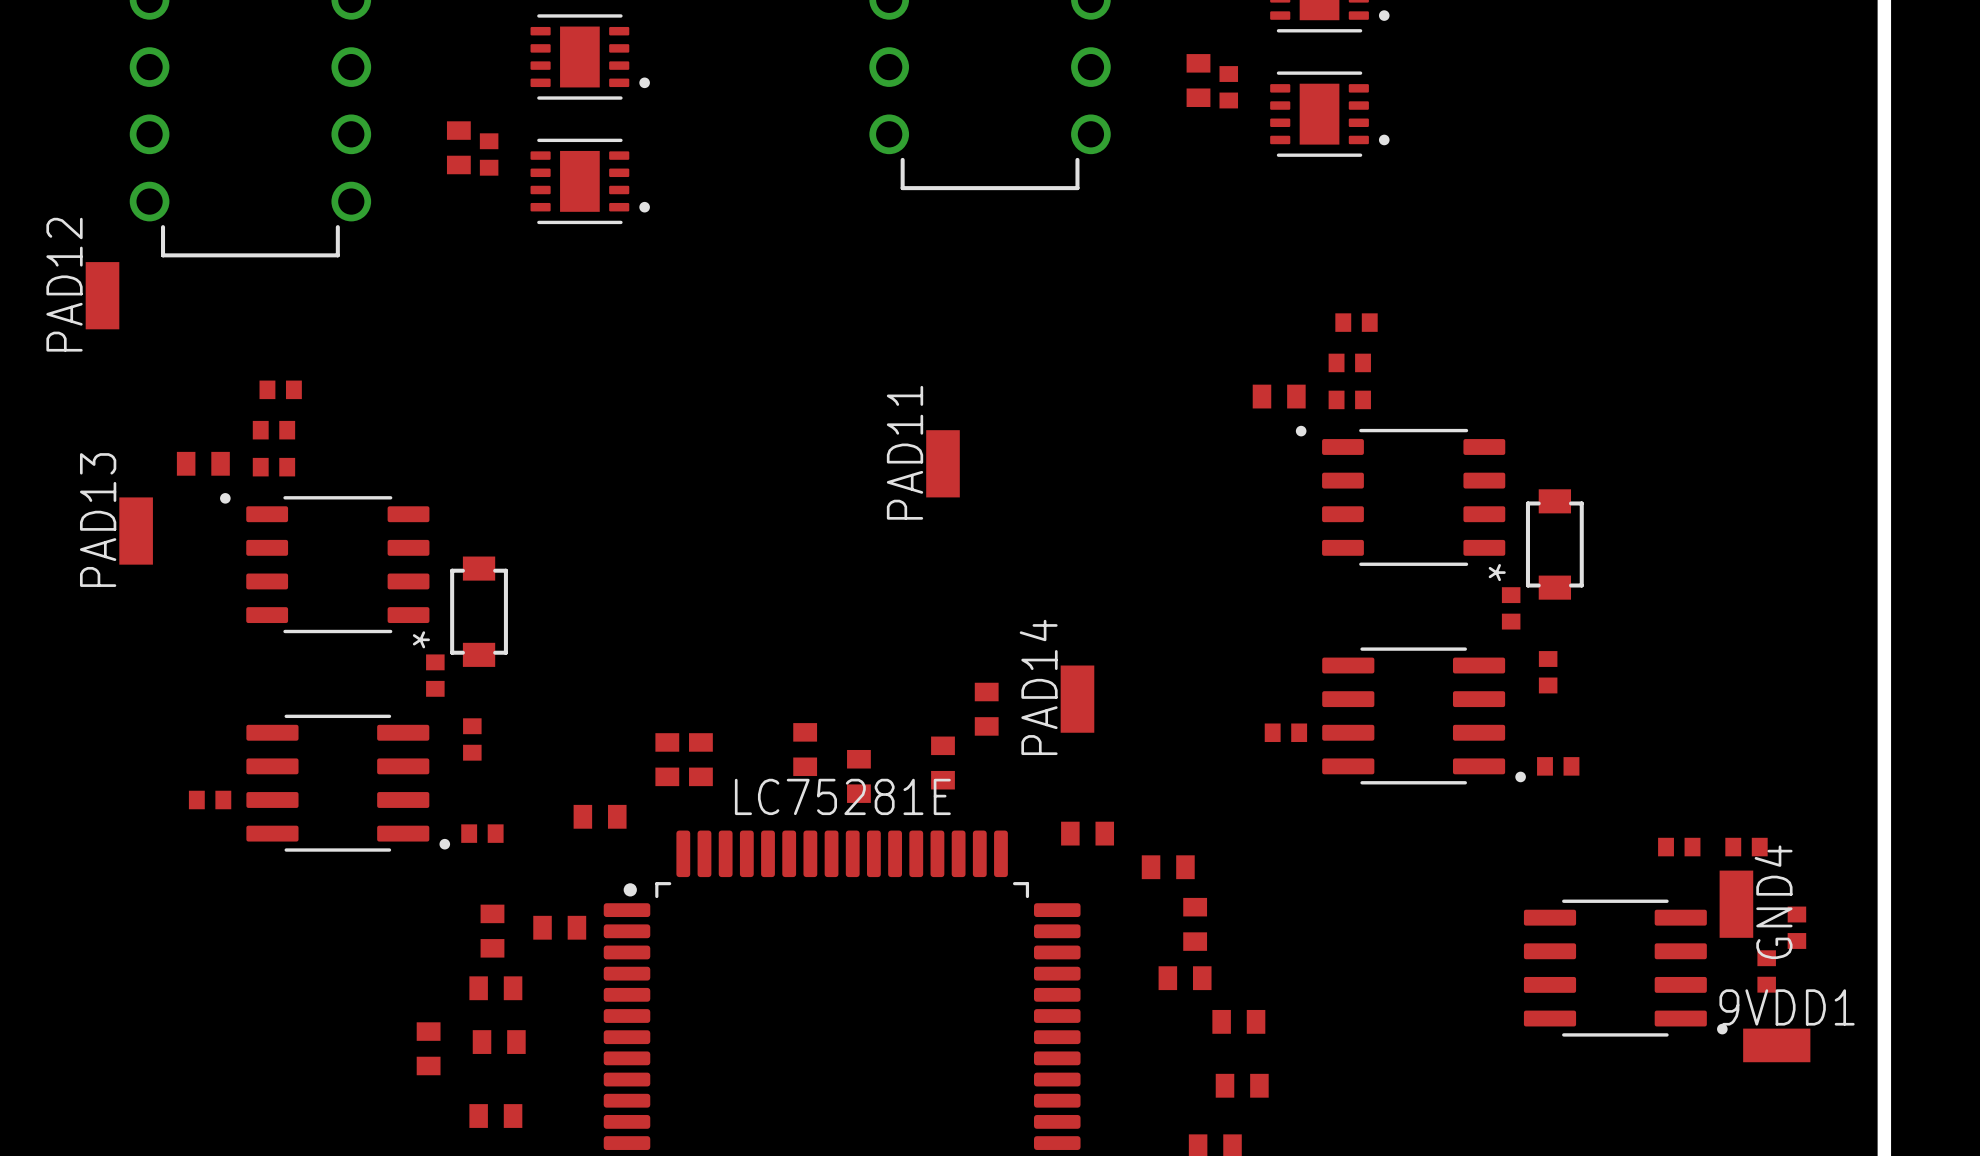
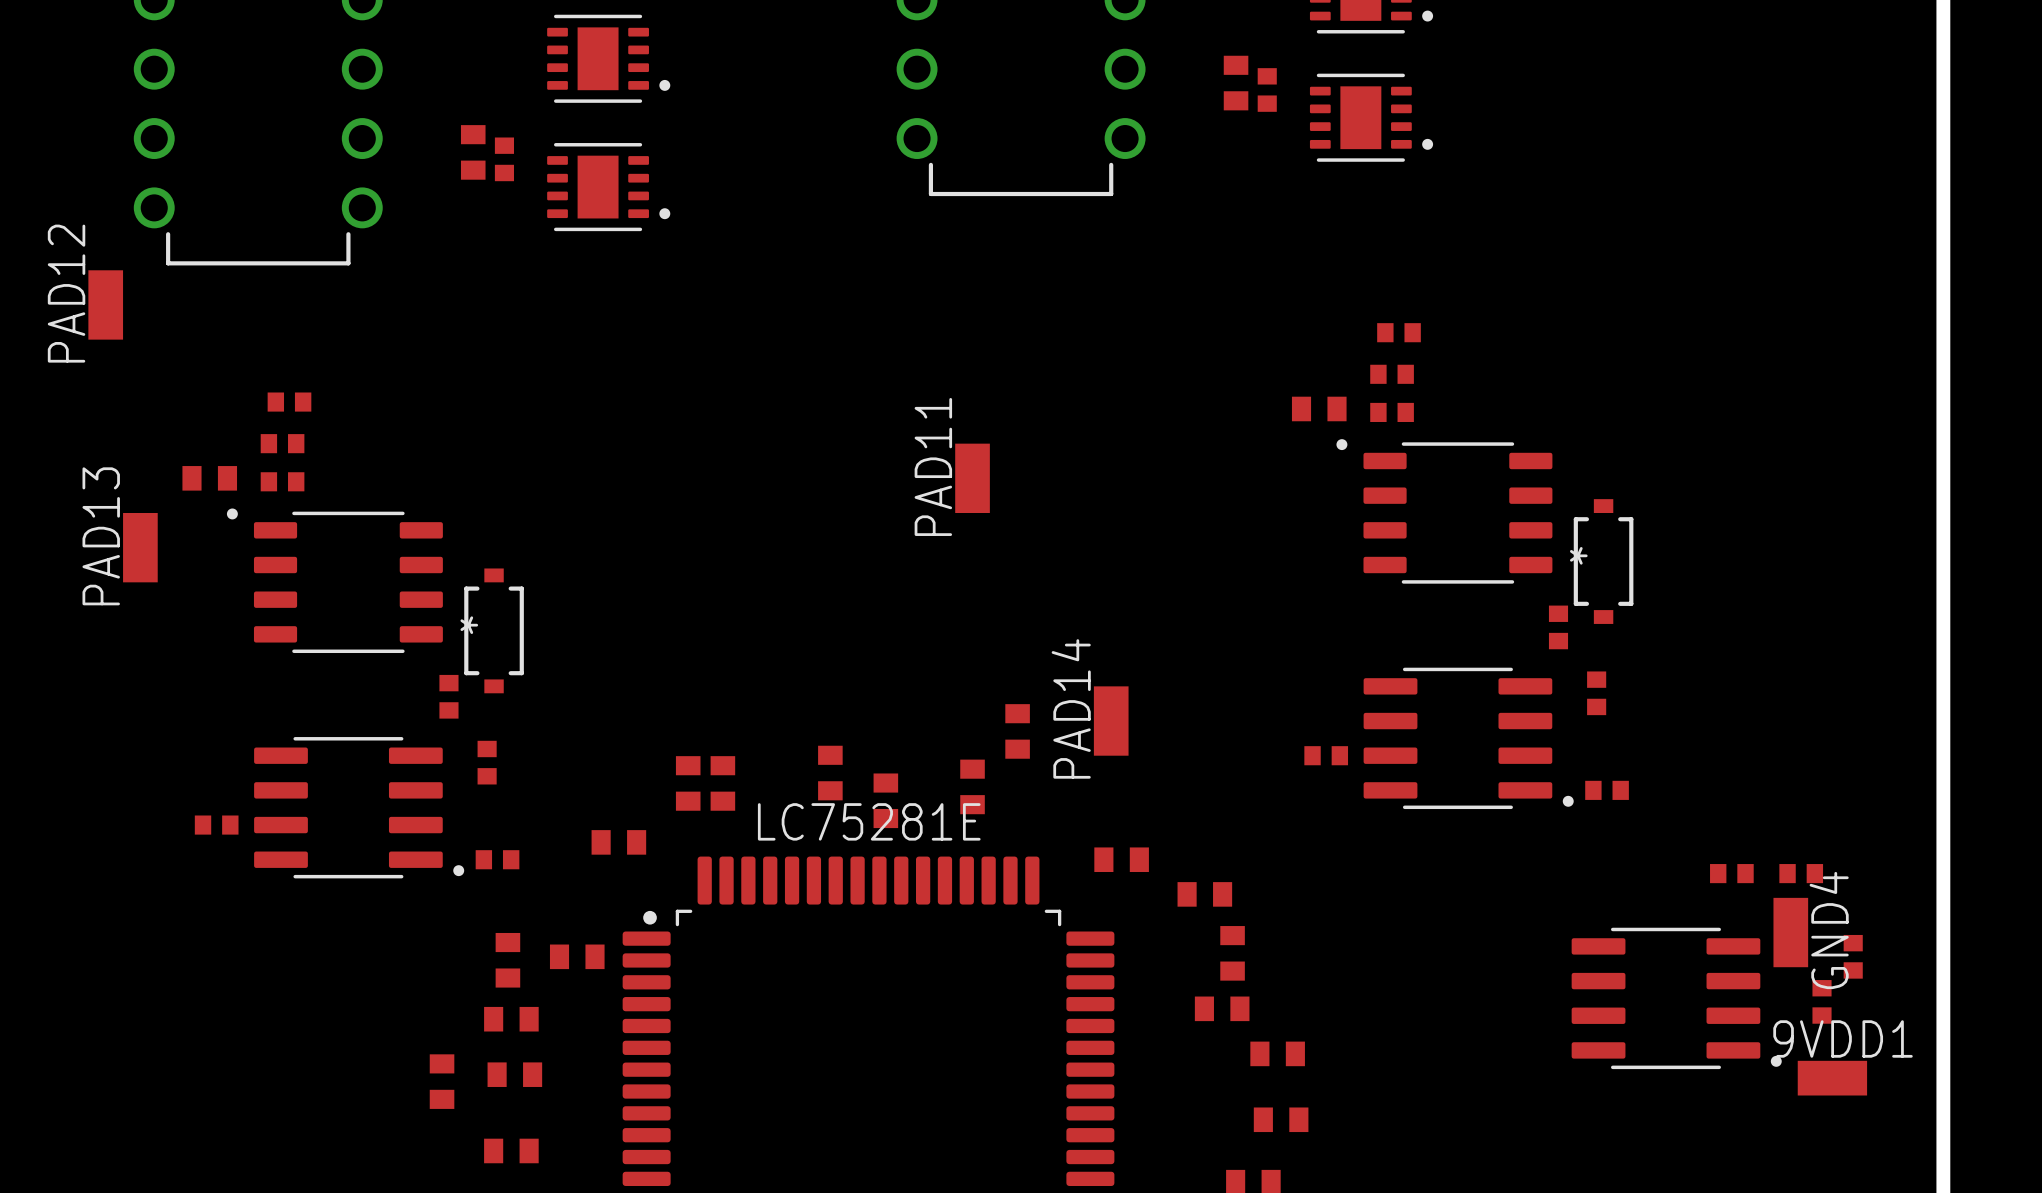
part footprint: [1525, 489, 1584, 600] -> [1573, 499, 1634, 624]
part footprint: [450, 556, 508, 667] -> [464, 568, 524, 694]

